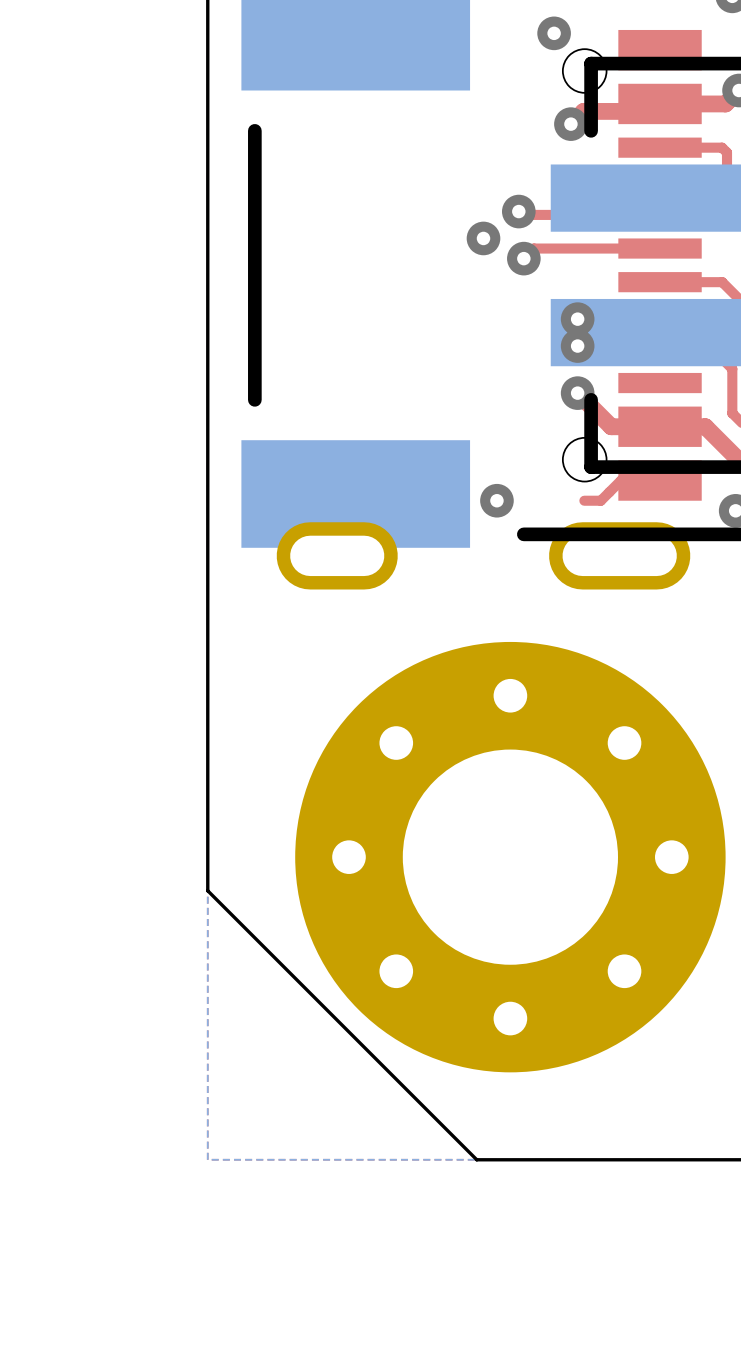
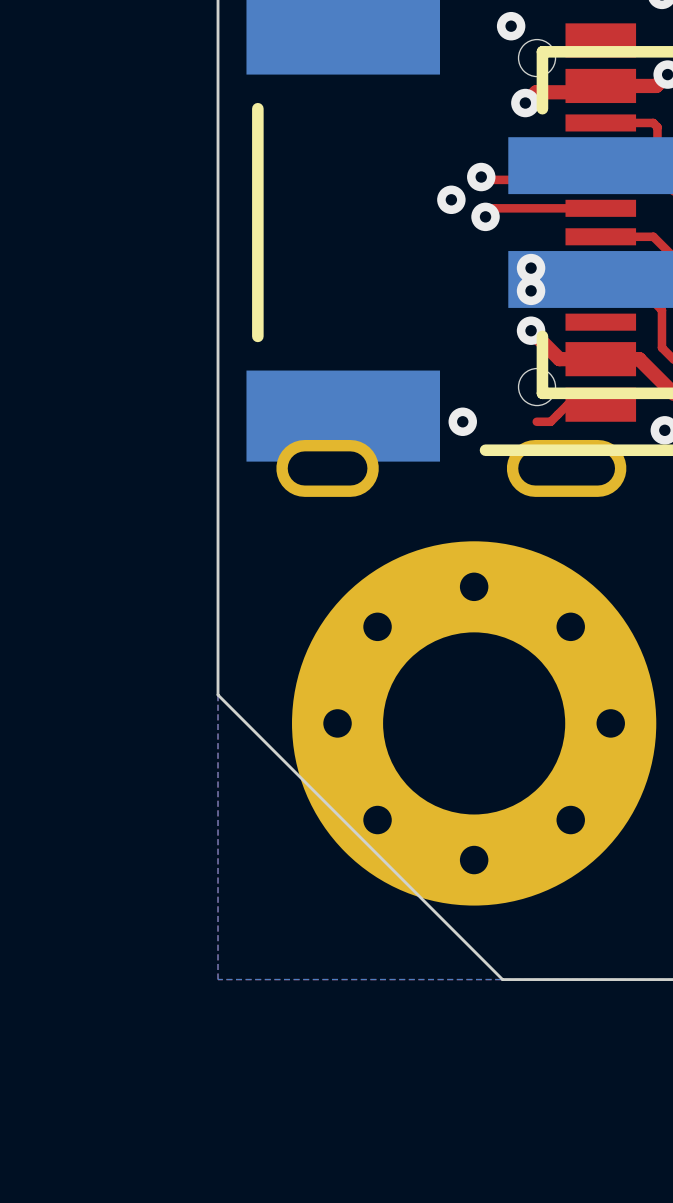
board edge: (207, 823) (207, 890) (476, 1159) (544, 1159) -> (218, 694) (502, 979)

